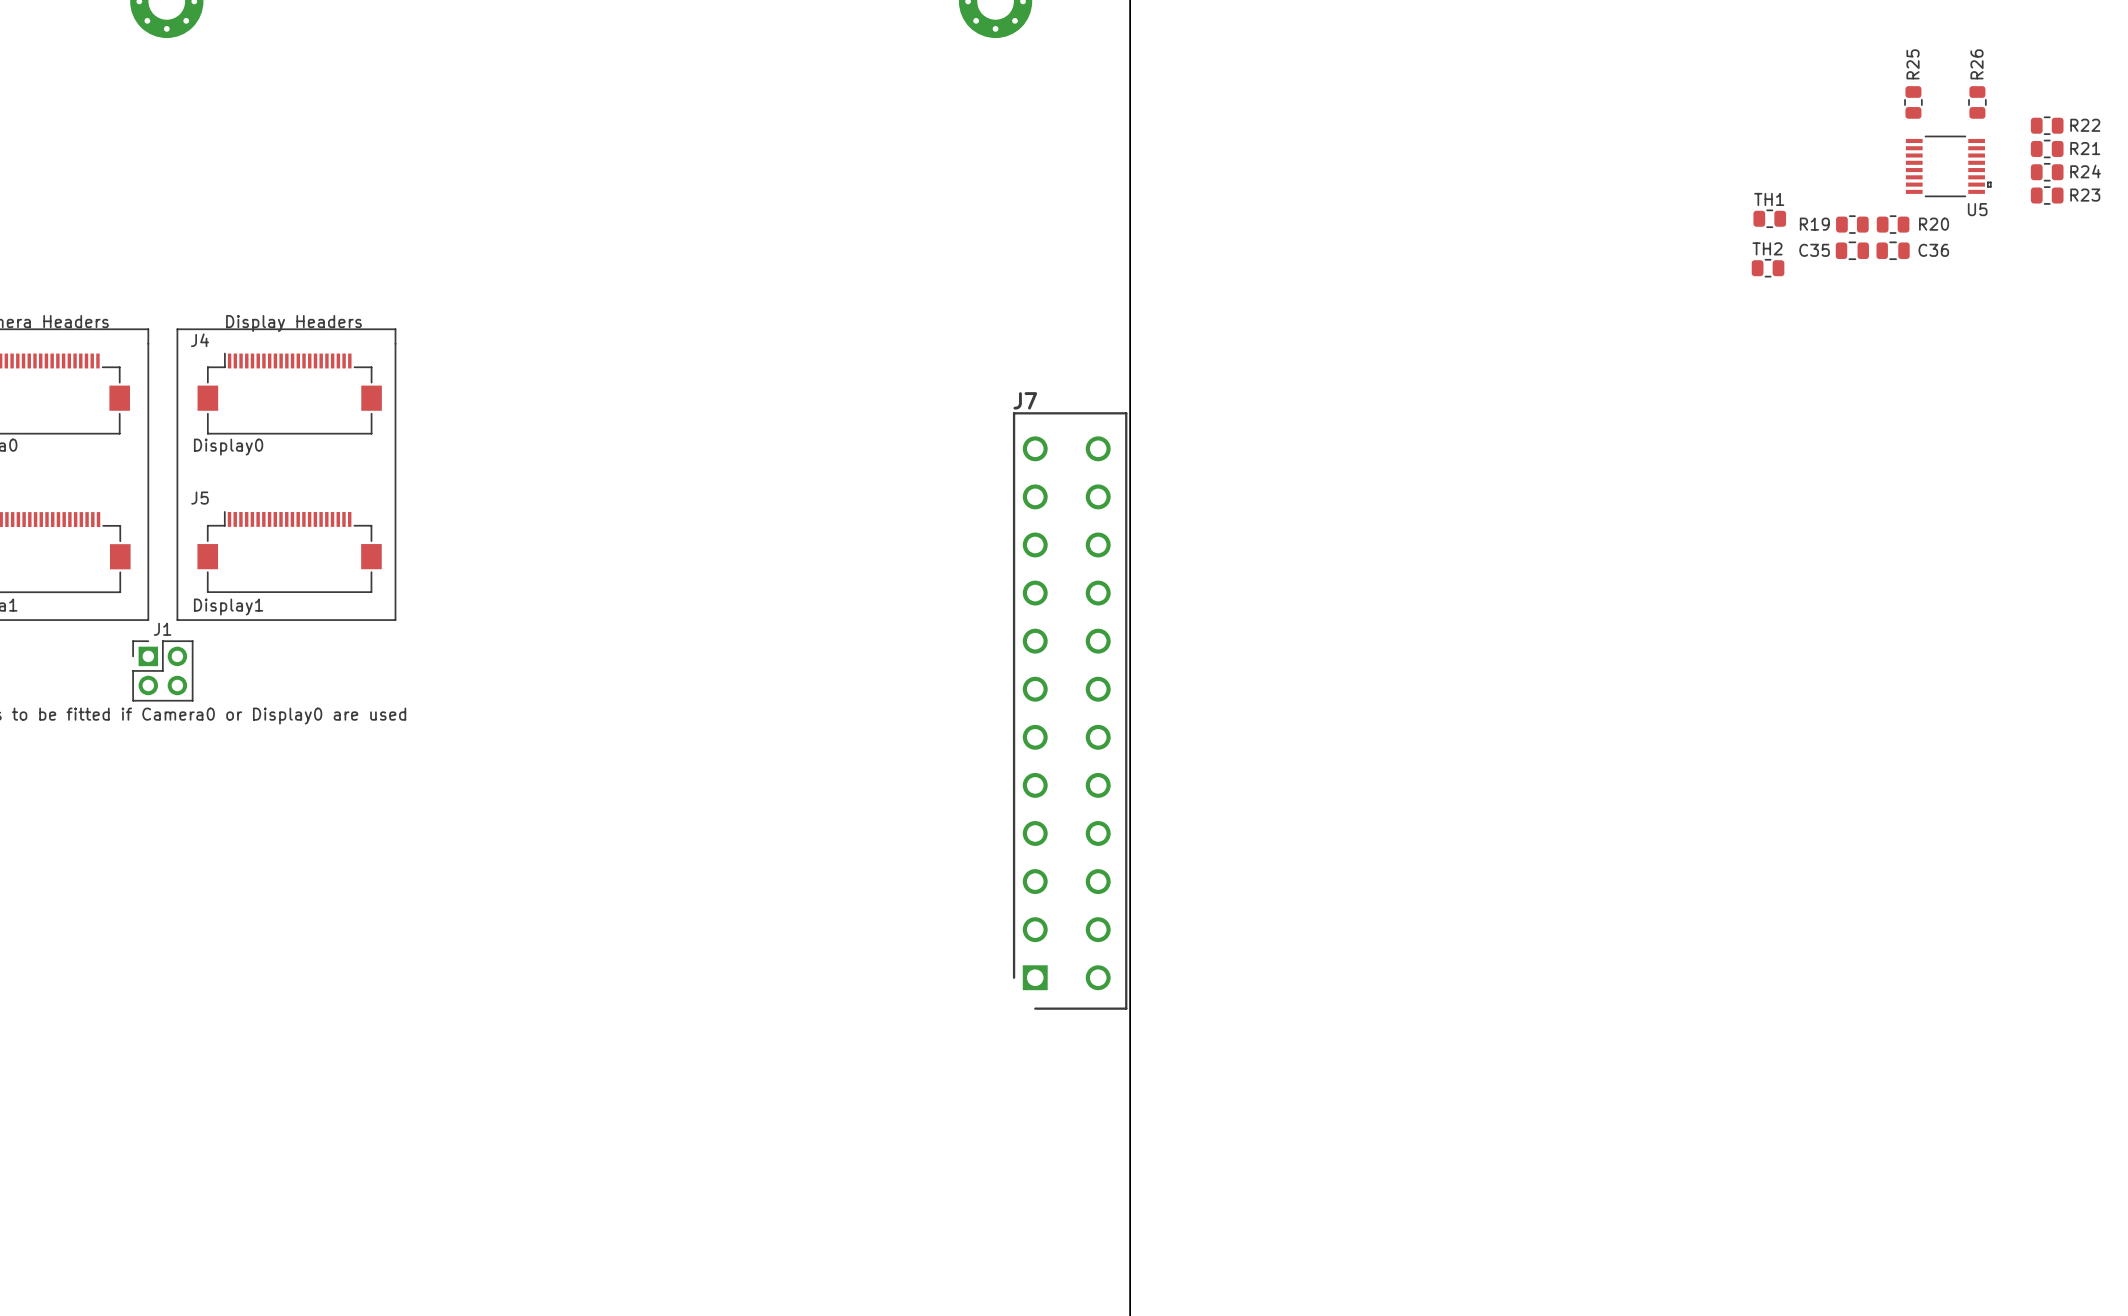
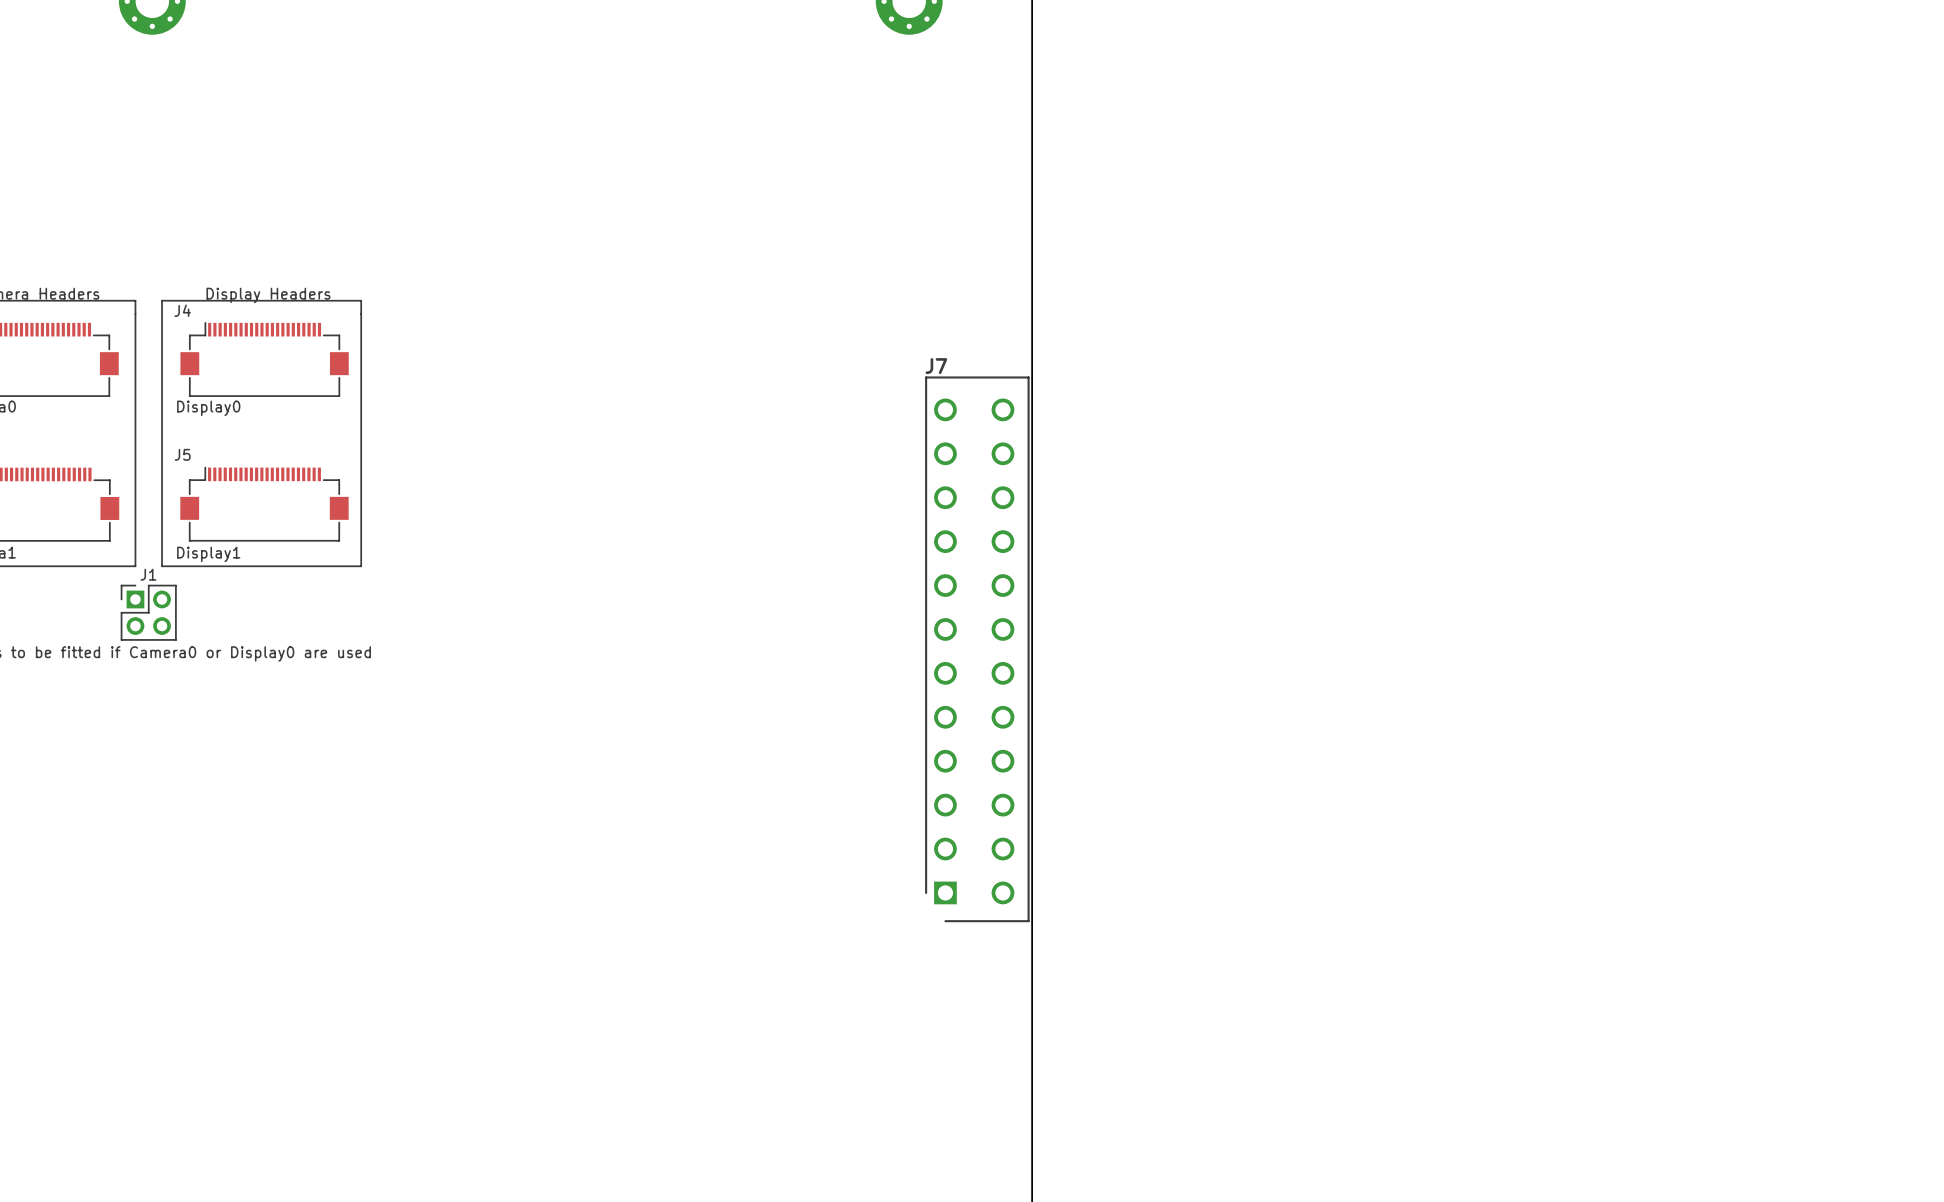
R25: (1913, 102) -> none
R26: (1977, 102) -> none
R22: (2047, 125) -> none
R21: (2047, 148) -> none
U5: (1948, 166) -> none
R24: (2047, 172) -> none
R23: (2047, 195) -> none
TH1: (1769, 218) -> none
R19: (1852, 224) -> none
R20: (1893, 224) -> none
C35: (1852, 250) -> none
C36: (1893, 250) -> none
TH2: (1768, 268) -> none

